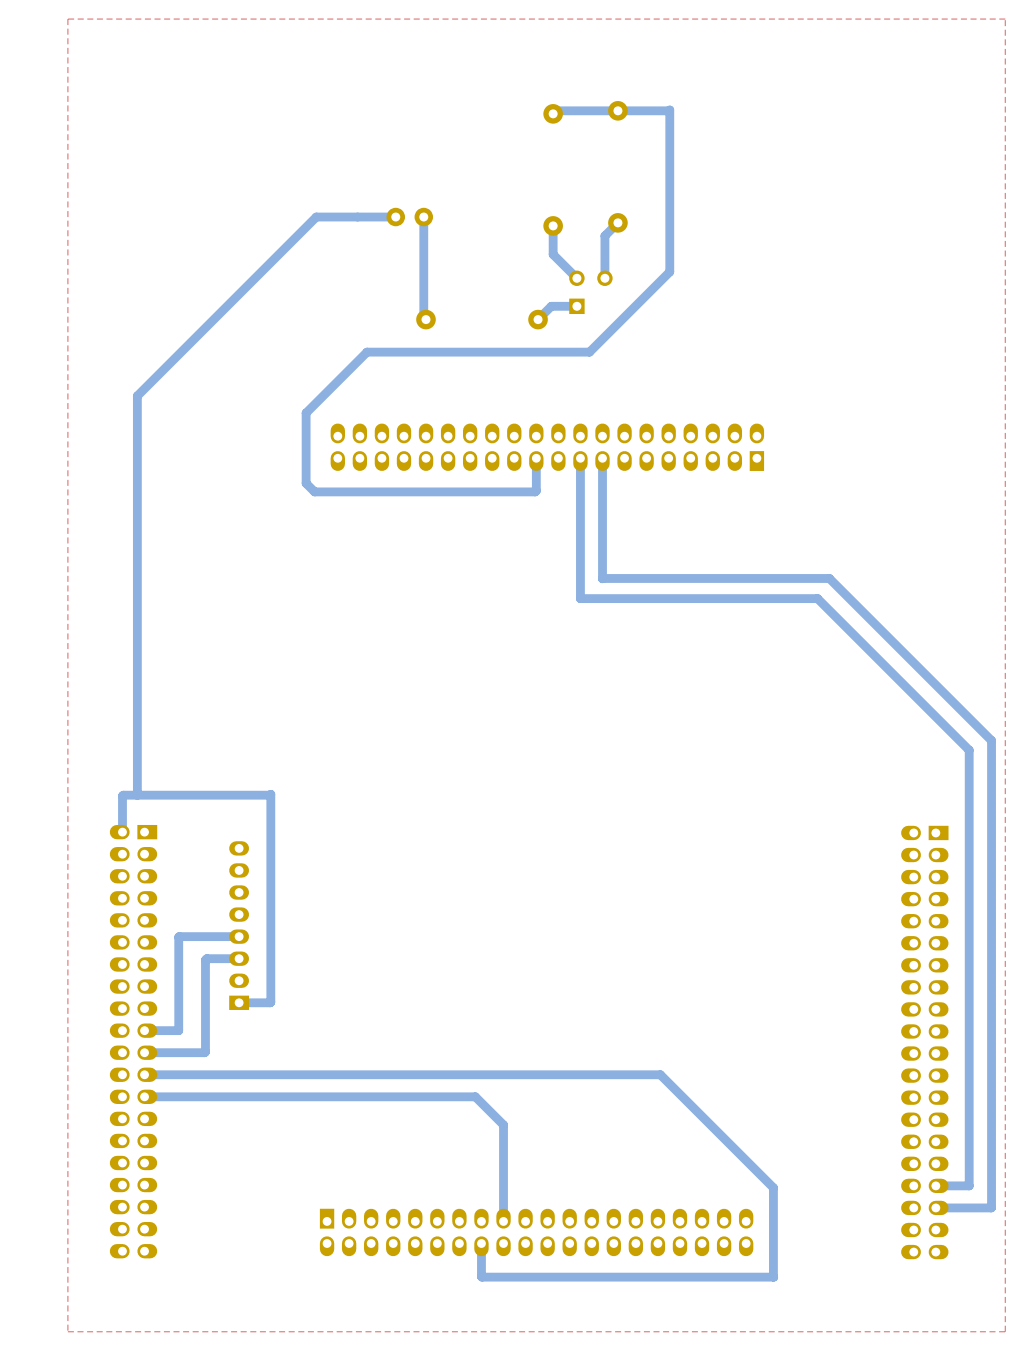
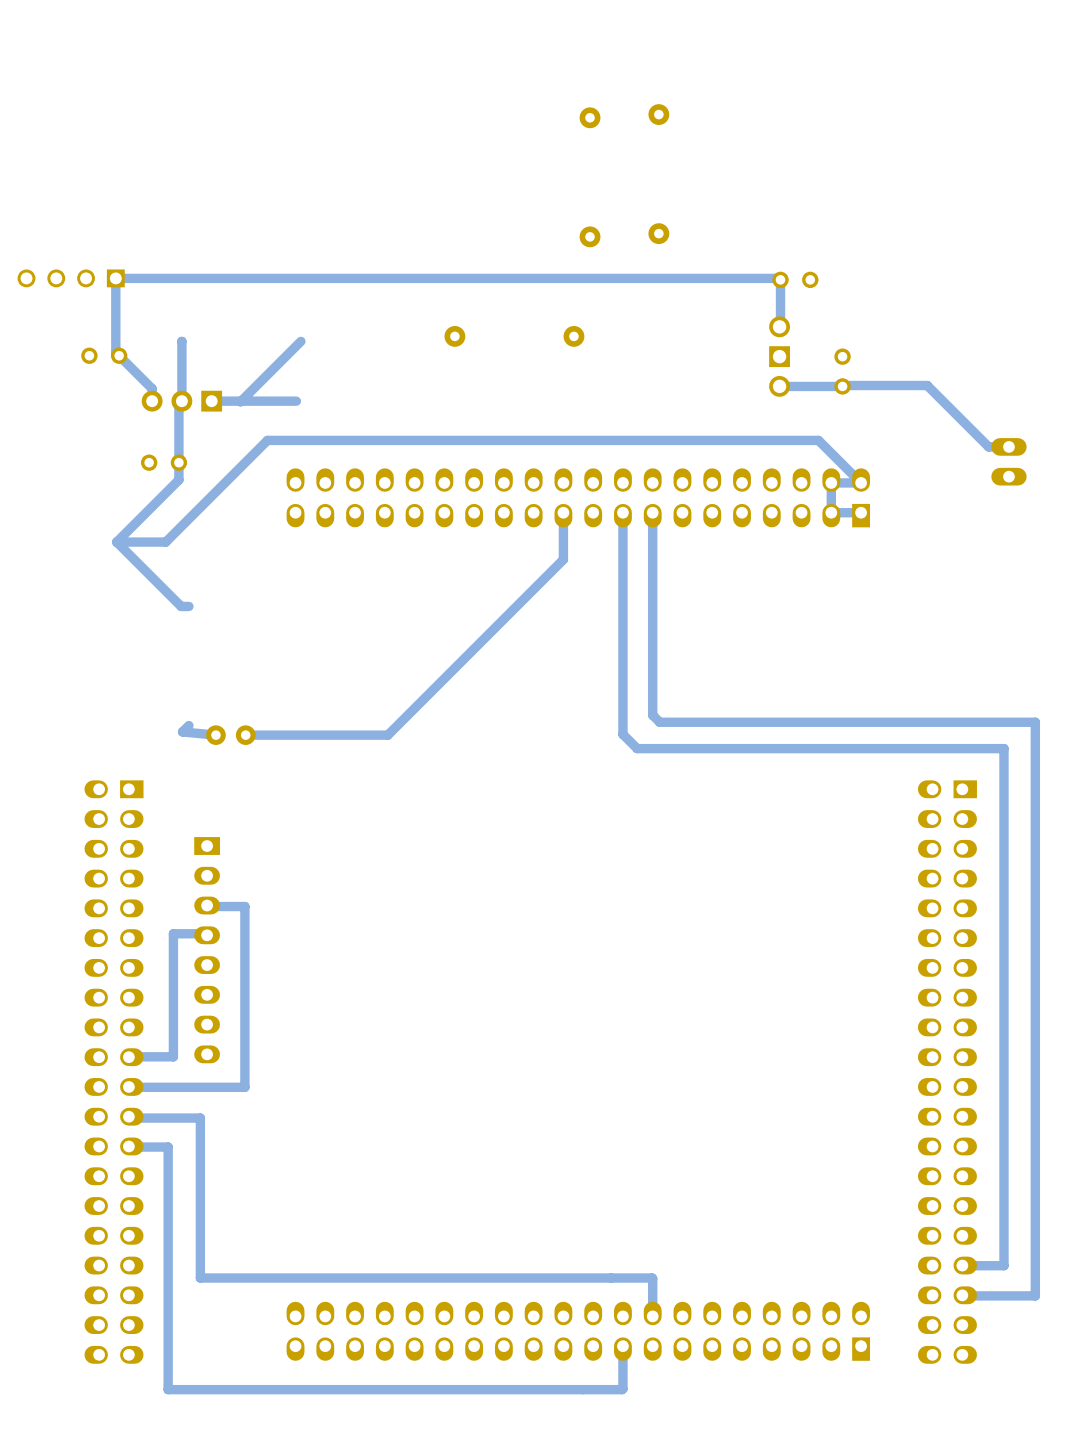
top zone outline: (1005, 19) (1005, 1331) (67, 1331) (67, 19) (1005, 19) -> none
bottom track: (553, 113) (556, 110) (669, 110) (669, 271) (589, 352) (367, 352) (306, 413) (306, 483) (314, 491) (535, 491) (536, 458) -> none
bottom track: (395, 217) (316, 217) (137, 395) (137, 795) -> none
part: (409, 217) -> none
bottom track: (423, 217) (423, 317) (425, 319) -> none
bottom track: (617, 222) (604, 235) (604, 278) -> none
bottom track: (553, 225) (553, 254) (576, 278) -> none
part: none -> (71, 278)
part: none -> (795, 279)
part: (590, 292) -> none
bottom track: (576, 306) (551, 306) (538, 319) -> none
bottom track: none -> (779, 326) (779, 278) (115, 278) (115, 352) (152, 388) (152, 401)
bottom track: none -> (181, 341) (181, 401) (178, 404) (178, 479) (116, 542)
bottom track: none -> (300, 341) (240, 401)
part: none -> (104, 355)
part: none -> (779, 356)
part: none -> (842, 371)
bottom track: none -> (779, 386) (927, 385) (988, 446) (1008, 446)
part: none -> (181, 401)
bottom track: none -> (296, 401) (211, 401)
part: none -> (1008, 461)
part: none -> (164, 462)
part: (547, 447) -> none
bottom track: (580, 458) (580, 598) (817, 598) (969, 750) (969, 1185) (935, 1185) -> none
bottom track: (602, 458) (602, 578) (829, 578) (991, 740) (991, 1207) (935, 1207) -> none
part: none -> (578, 497)
bottom track: none -> (563, 512) (563, 559) (387, 735) (245, 735)
bottom track: none -> (622, 512) (622, 734) (637, 748) (1003, 748) (1003, 1265) (962, 1265)
bottom track: none -> (652, 512) (652, 715) (659, 722) (1035, 722) (1035, 1295) (962, 1295)
bottom track: none -> (861, 512) (831, 512) (831, 482) (861, 482) (818, 440) (267, 440) (165, 542) (116, 542)
bottom track: none -> (116, 542) (181, 606) (188, 606)
bottom track: none -> (188, 725) (182, 731) (215, 735)
part: none -> (230, 735)
bottom track: (122, 832) (123, 795) (270, 794) (270, 1002) (239, 1002) -> none
bottom track: none -> (207, 905) (244, 906) (244, 1087) (128, 1086)
bottom track: none -> (207, 935) (173, 933) (173, 1056) (128, 1057)
part: none -> (207, 950)
part: (239, 925) -> none
bottom track: (239, 936) (179, 936) (178, 1030) (144, 1030) -> none
bottom track: (239, 958) (205, 960) (204, 1052) (144, 1052) -> none
part: none -> (113, 1072)
part: none -> (947, 1072)
part: (133, 1041) -> none
part: (924, 1042) -> none
bottom track: none -> (128, 1116) (200, 1118) (200, 1278) (652, 1278) (652, 1316)
bottom track: (144, 1074) (660, 1074) (773, 1187) (773, 1277) (482, 1277) (481, 1243) -> none
bottom track: none -> (128, 1146) (168, 1147) (168, 1389) (622, 1389) (622, 1346)
bottom track: (144, 1096) (475, 1096) (503, 1124) (503, 1221) -> none
part: (536, 1232) -> none
part: none -> (578, 1331)

